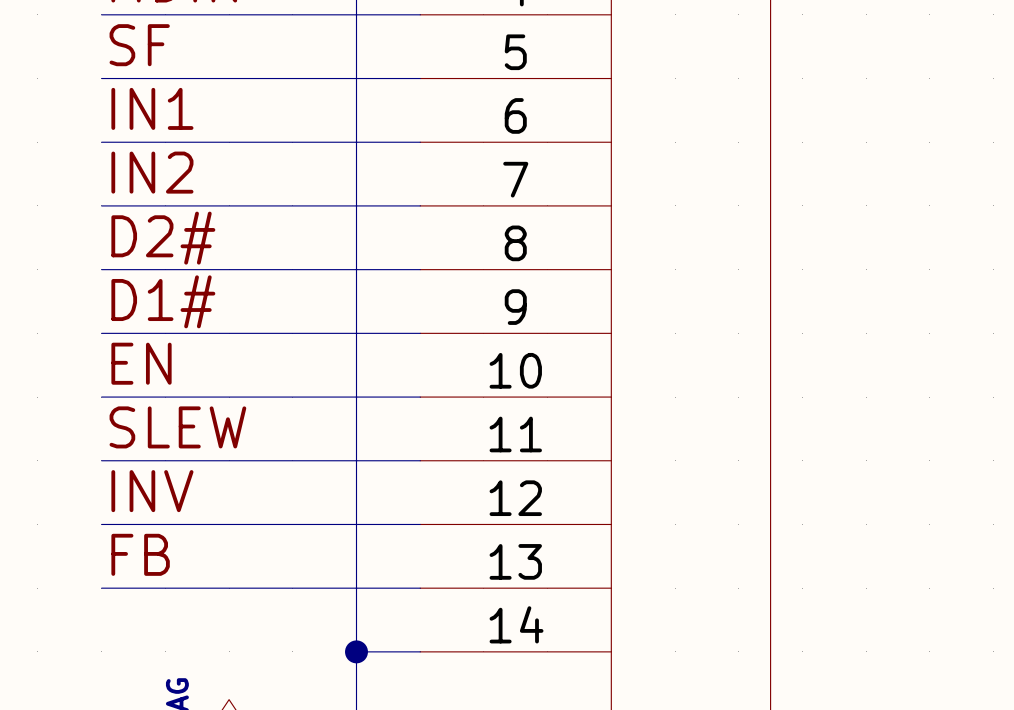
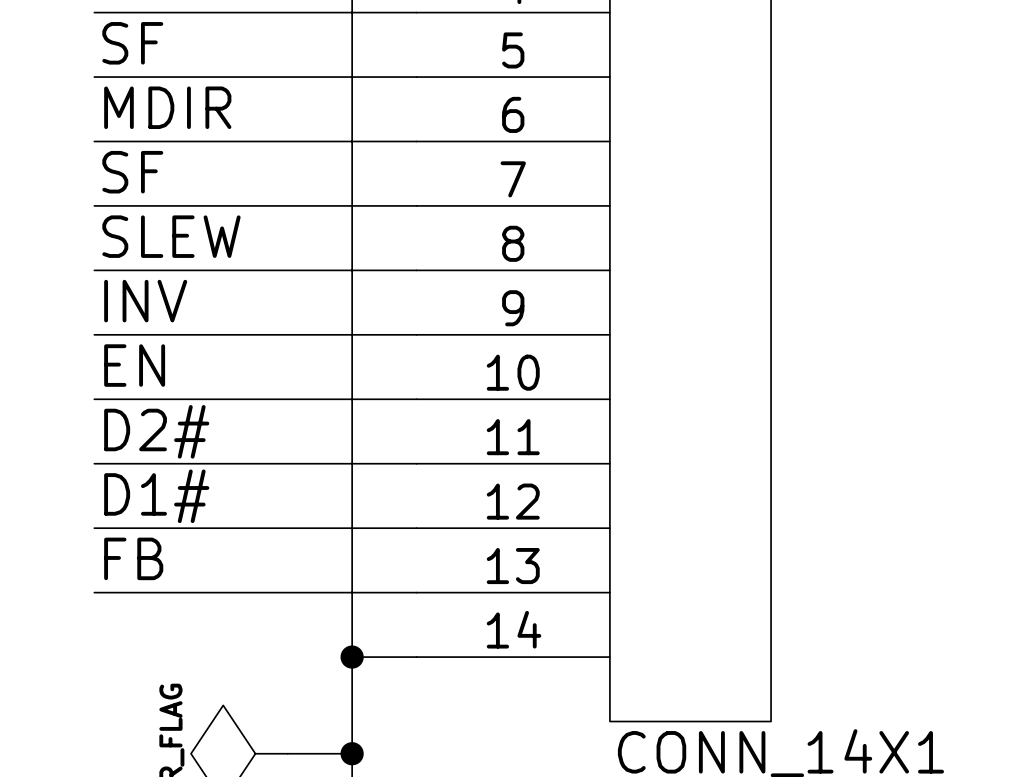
label: IN1 (152, 108) -> MDIR (167, 107)
label: IN2 (152, 172) -> SF (132, 172)
label: D2# (163, 238) -> SLEW (171, 236)
label: D1# (163, 301) -> INV (145, 301)
label: SLEW (177, 427) -> D2# (156, 431)
label: INV (152, 491) -> D1# (156, 496)

